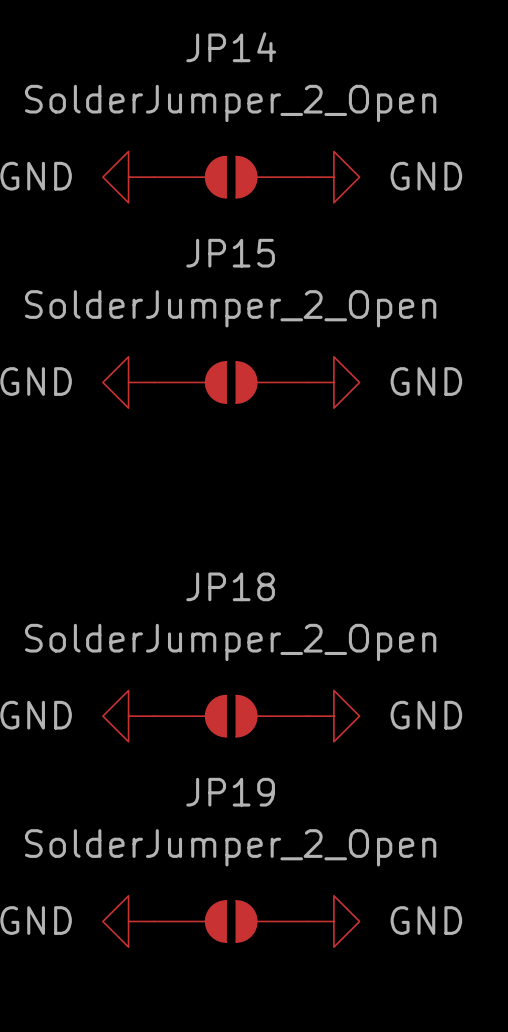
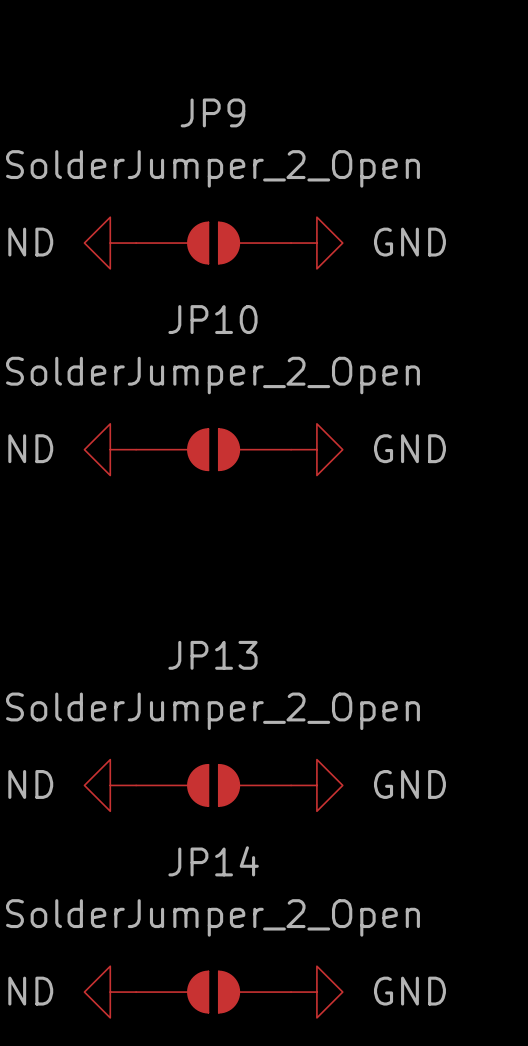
JP14 name: JP14 (231, 47) -> JP9 (212, 112)
JP15 name: JP15 (230, 253) -> JP10 (212, 319)
JP18 name: JP18 (230, 586) -> JP13 (212, 655)
JP19 name: JP19 (230, 792) -> JP14 (213, 861)

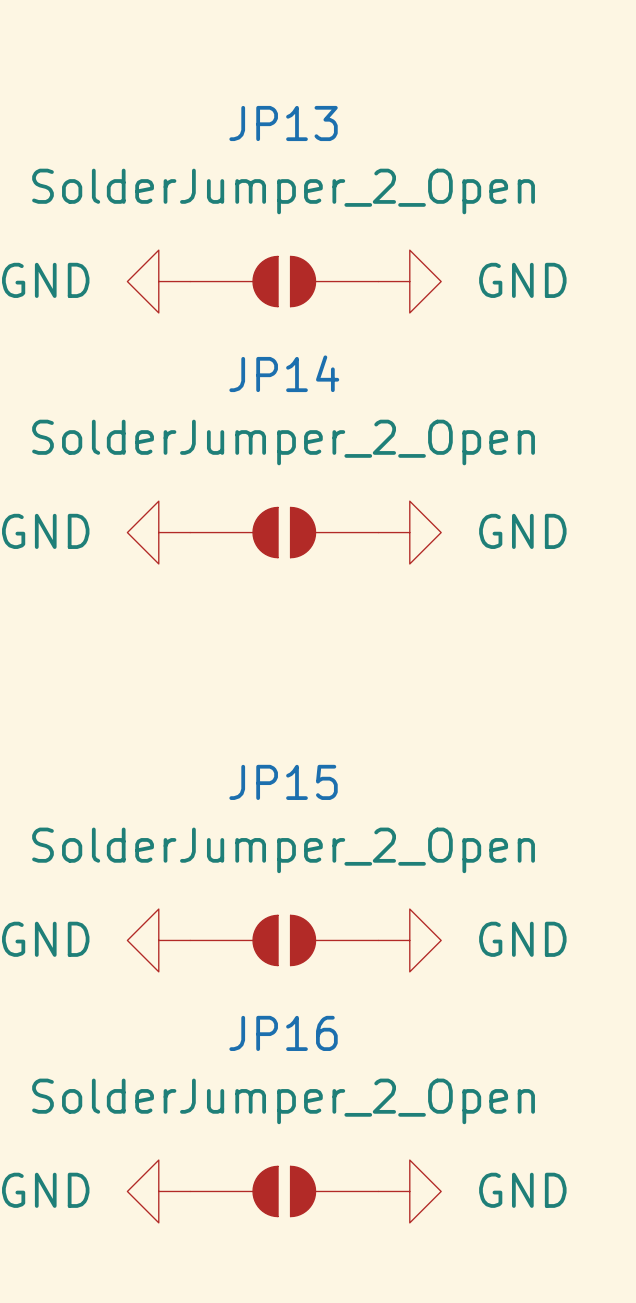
JP9 name: JP9 (212, 112) -> JP13 (283, 123)
JP10 name: JP10 (212, 319) -> JP14 (284, 373)
JP13 name: JP13 (212, 655) -> JP15 (283, 782)
JP14 name: JP14 (213, 861) -> JP16 (283, 1033)

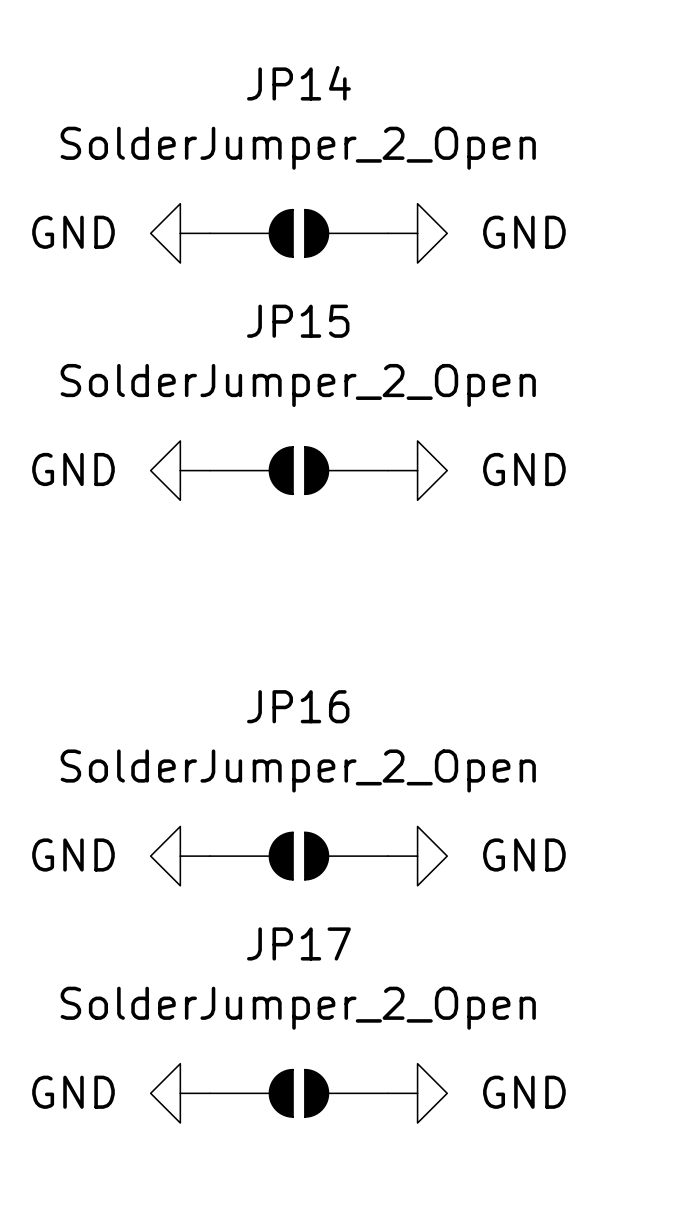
JP13 name: JP13 (283, 123) -> JP14 (298, 83)
JP14 name: JP14 (284, 373) -> JP15 (298, 321)
JP15 name: JP15 (283, 782) -> JP16 (298, 706)
JP16 name: JP16 (283, 1033) -> JP17 (298, 943)

